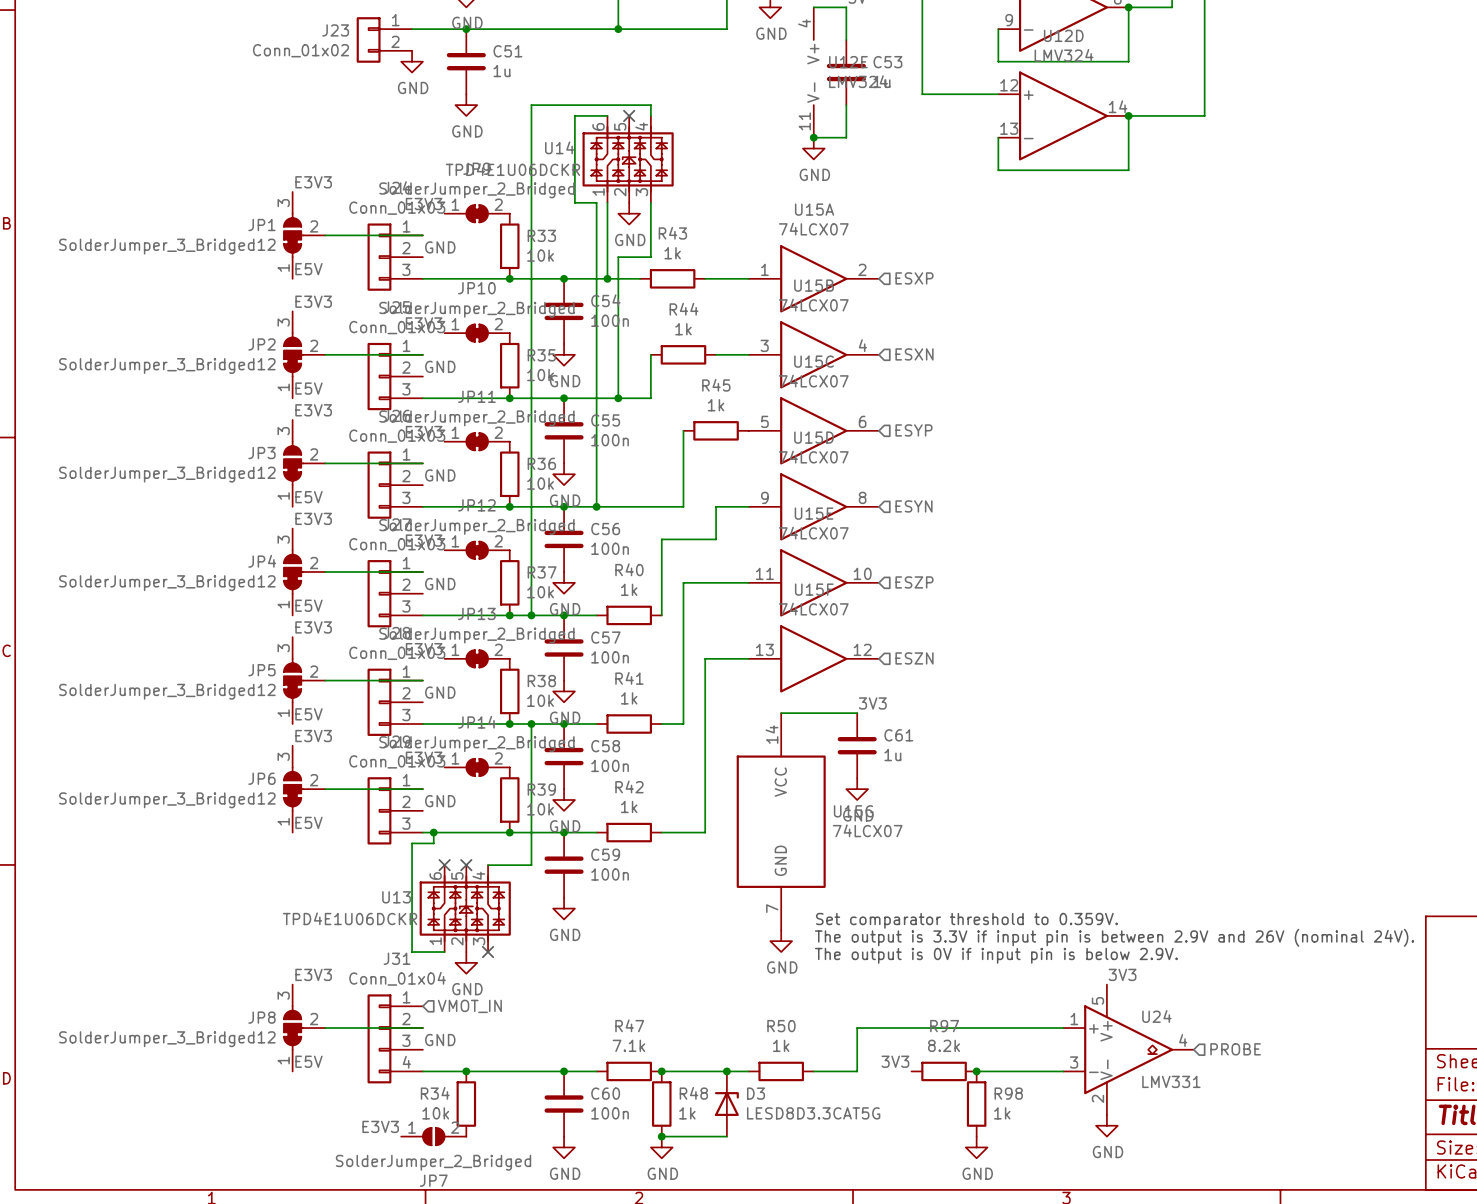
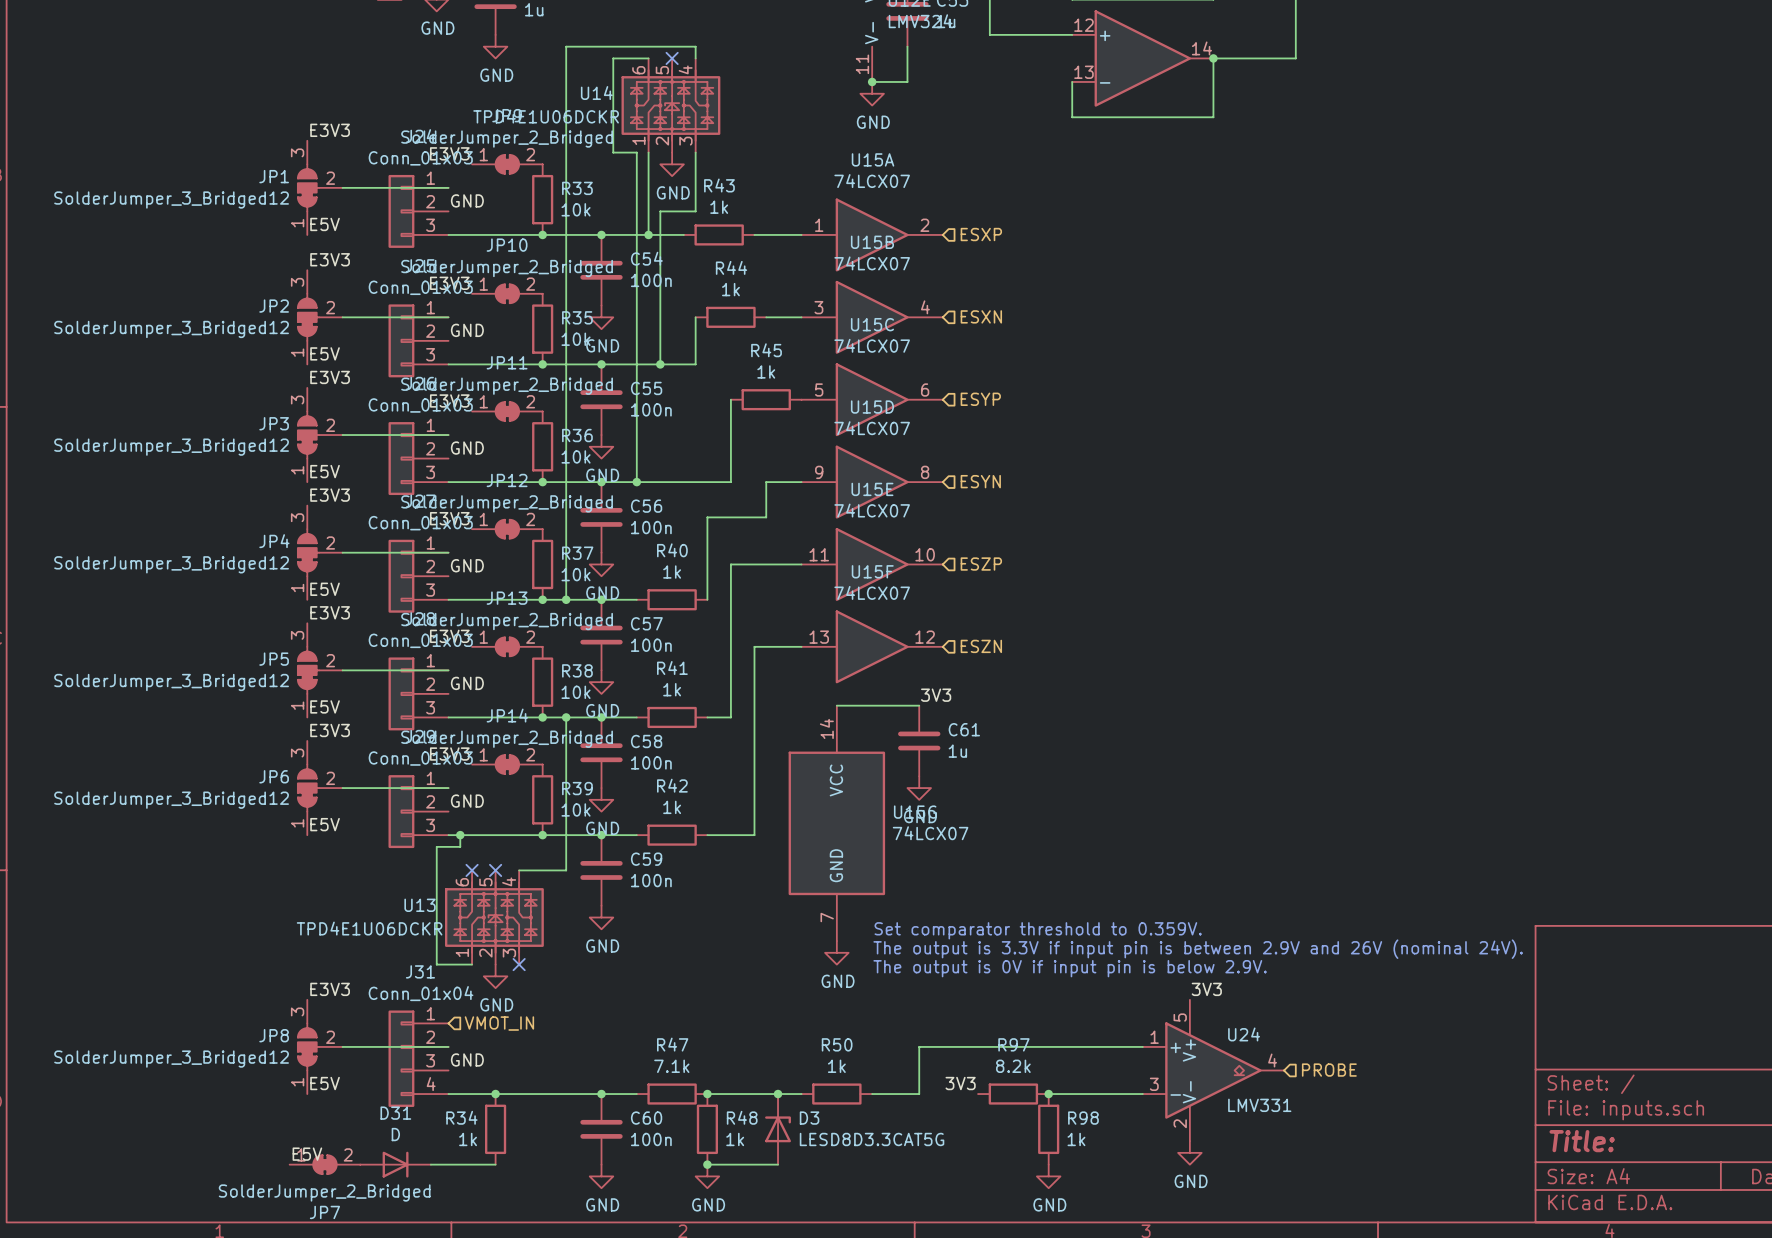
R34 value: 10k (435, 1113) -> 1k (468, 1139)
label: none -> E5V (307, 1154)
label: E3V3 (380, 1126) -> none
JP7 symbol: [401, 1127, 467, 1146] -> [289, 1155, 361, 1175]
D31: none -> D (395, 1164)

